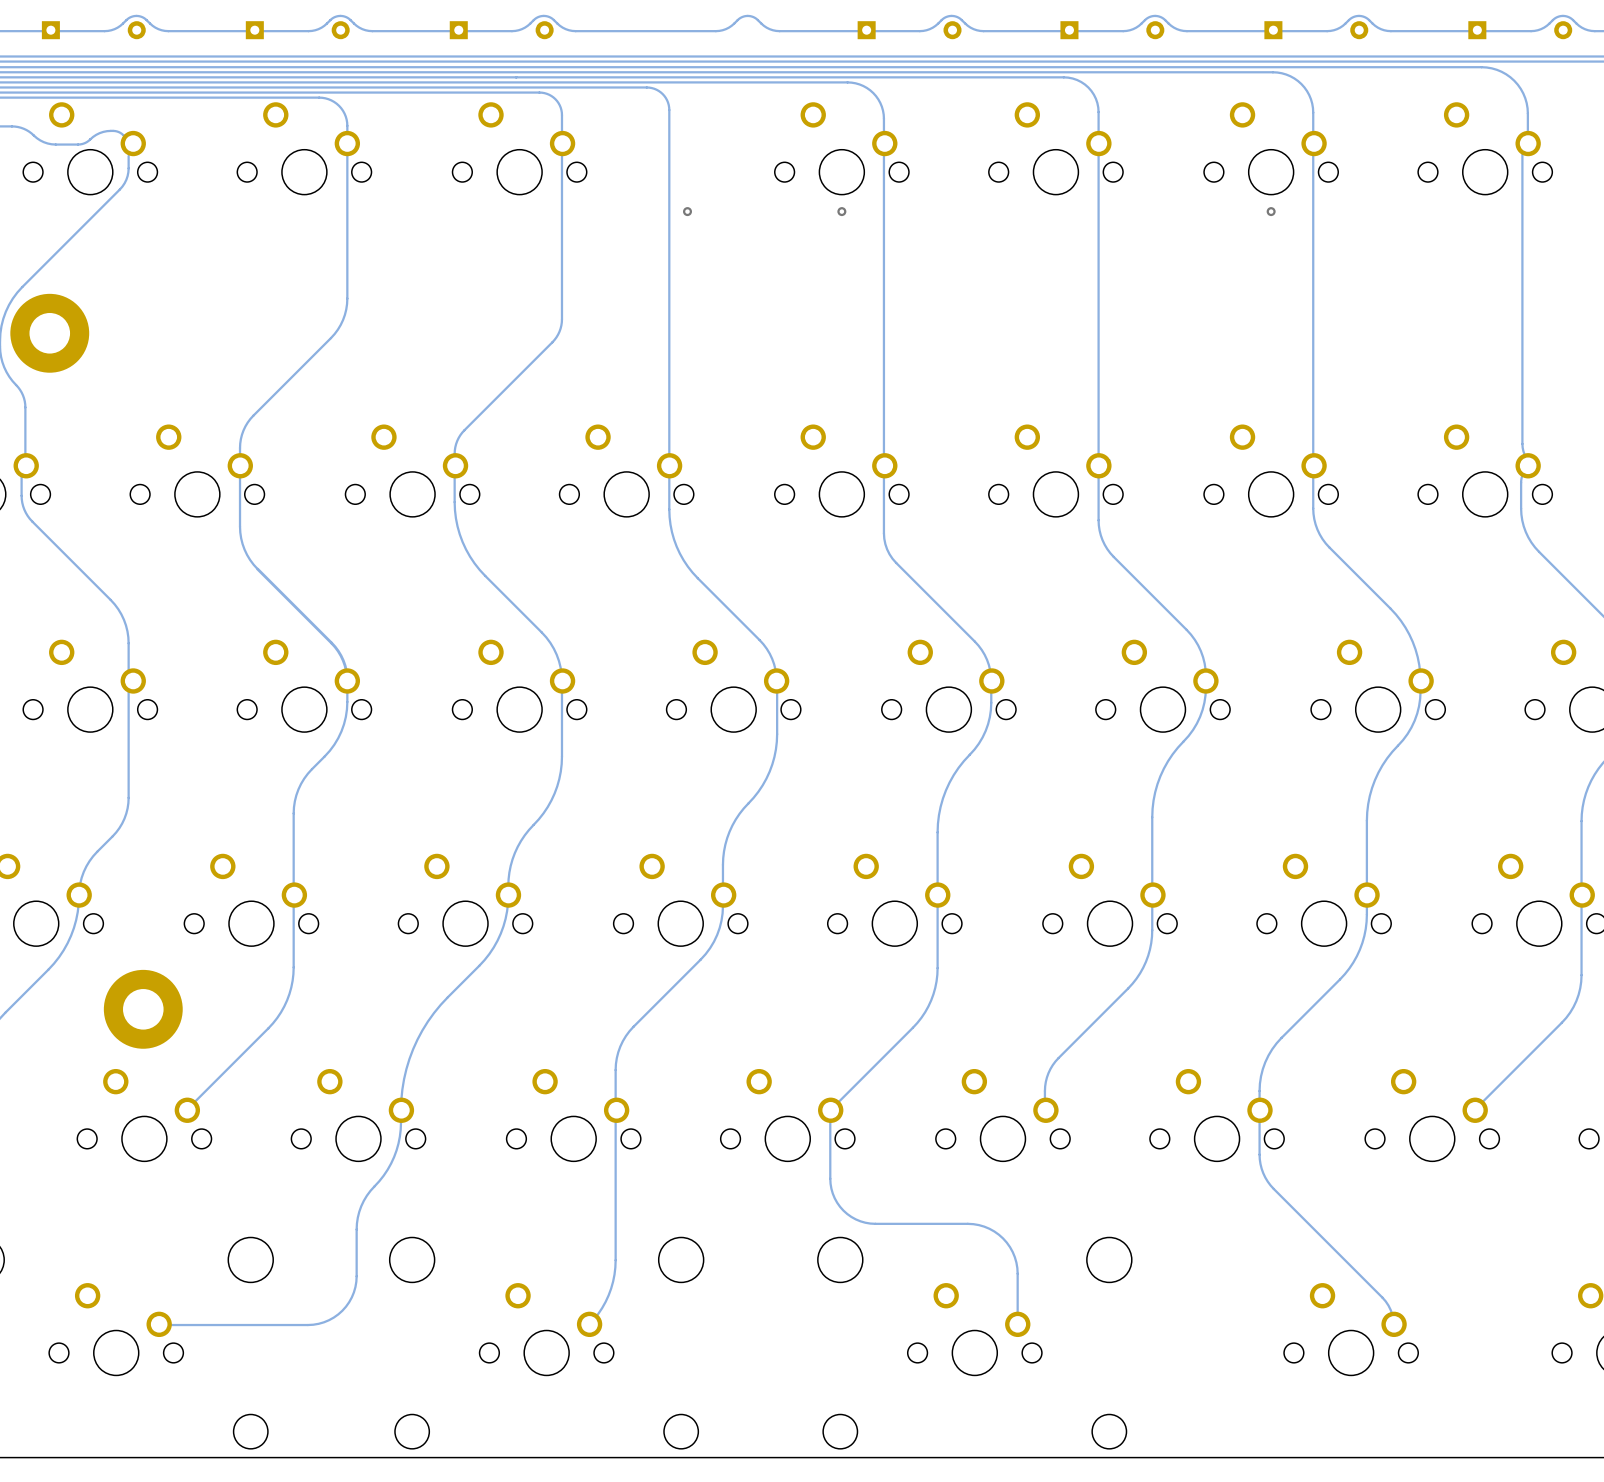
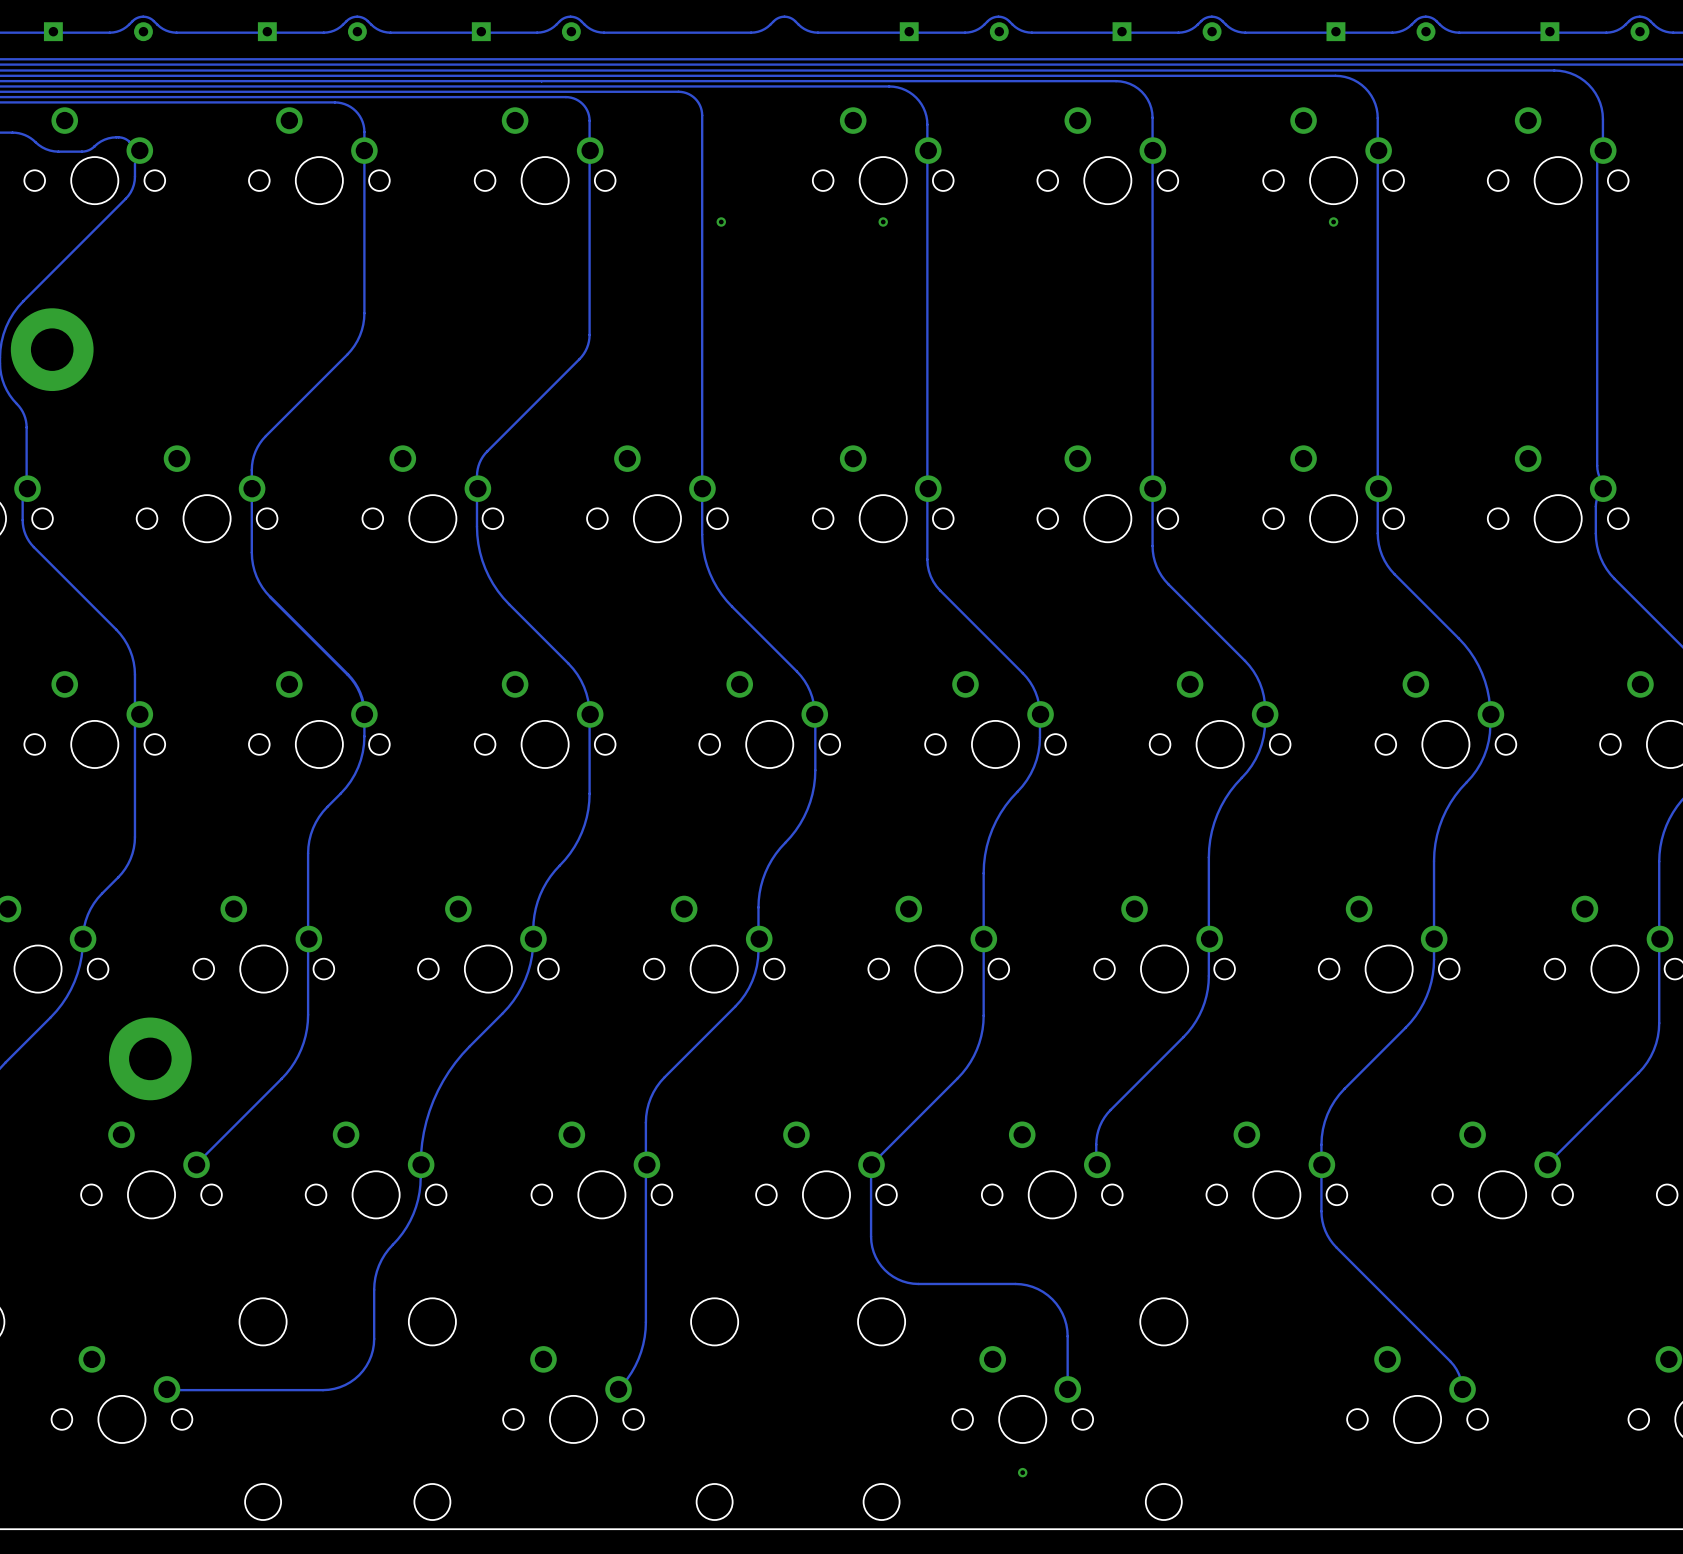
via: none -> (1022, 1472)

